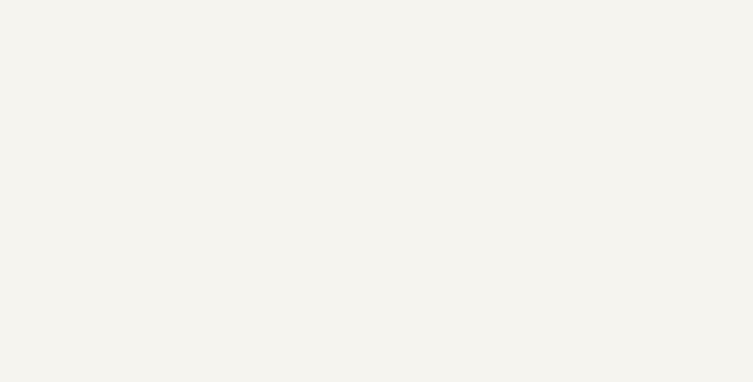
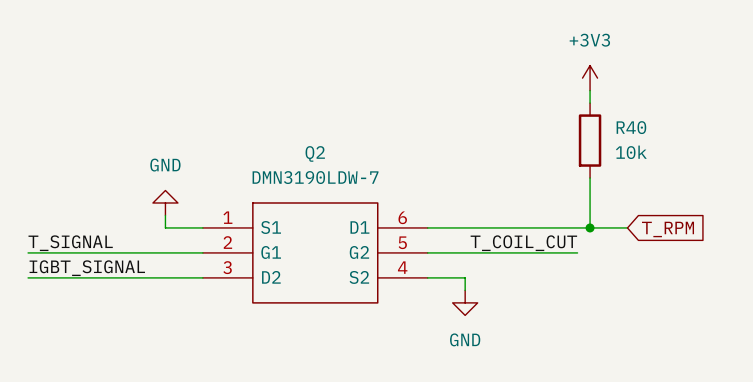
power symbol: none -> +3V3 (590, 78)
wire: none -> (590, 90) (590, 103)
R40: none -> 10k (590, 140)
wire: none -> (590, 178) (590, 227)
power symbol: none -> GND (165, 202)
wire: none -> (165, 215) (165, 227) (202, 227)
wire: none -> (427, 227) (627, 227)
junction: none -> (590, 227)
global label: none -> T_RPM (668, 229)
label: none -> T_SIGNAL (70, 243)
label: none -> T_COIL_CUT (523, 243)
wire: none -> (28, 252) (202, 252)
Q2: none -> DMN3190LDW-7 (315, 252)
wire: none -> (427, 252) (577, 252)
label: none -> IGBT_SIGNAL (87, 268)
wire: none -> (28, 277) (202, 277)
wire: none -> (427, 277) (465, 277) (465, 290)
power symbol: none -> GND (465, 302)

